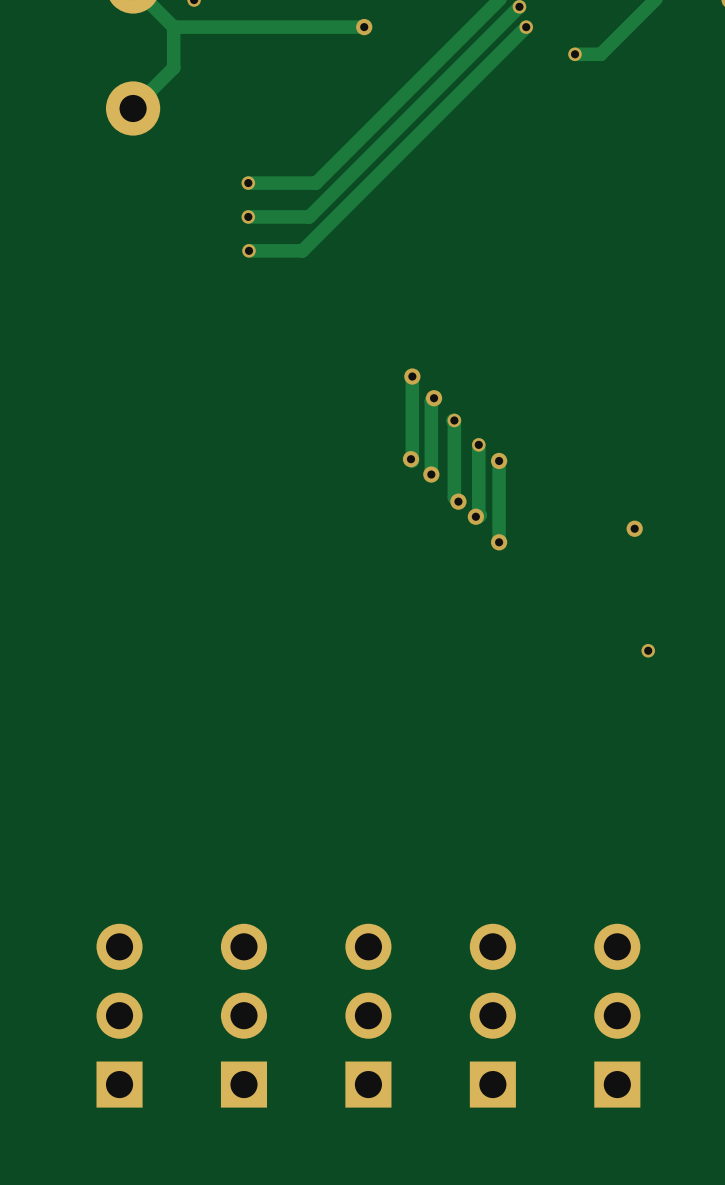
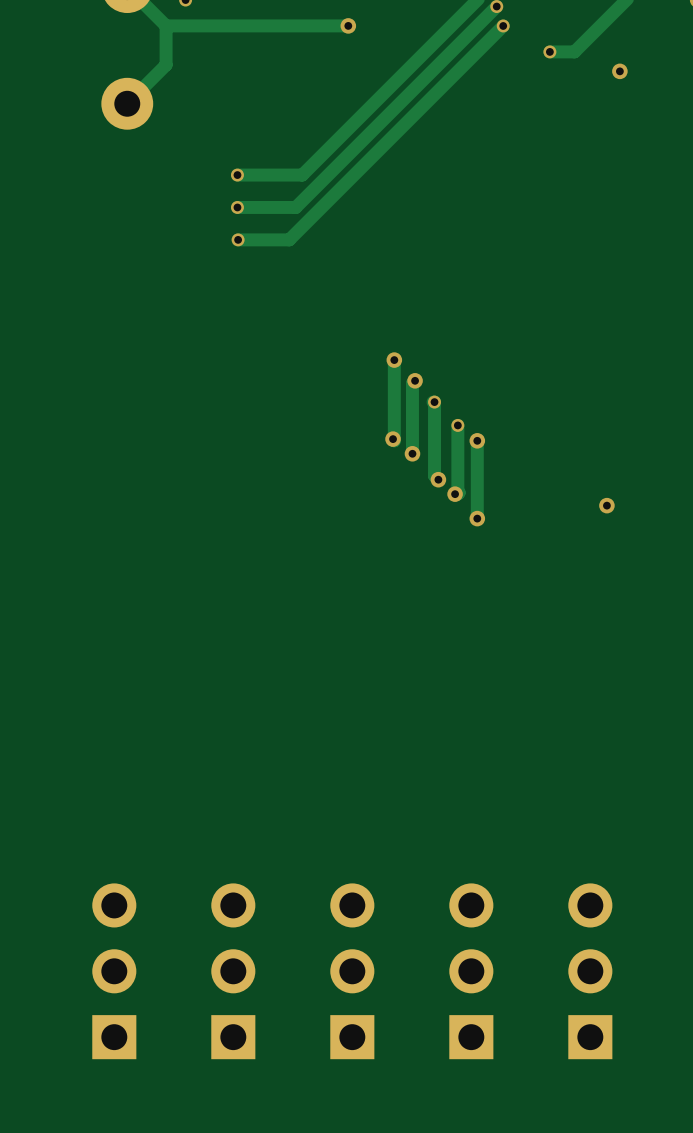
via: none -> (619, 71)
via: (648, 650) -> none

